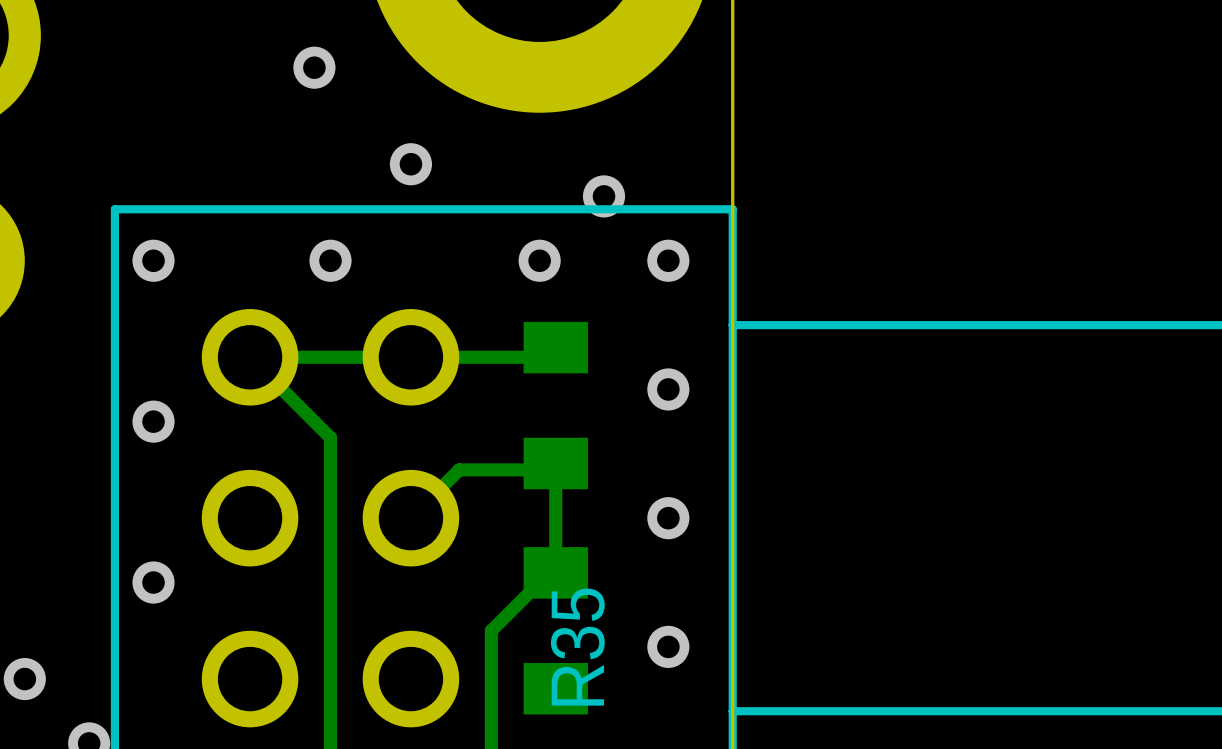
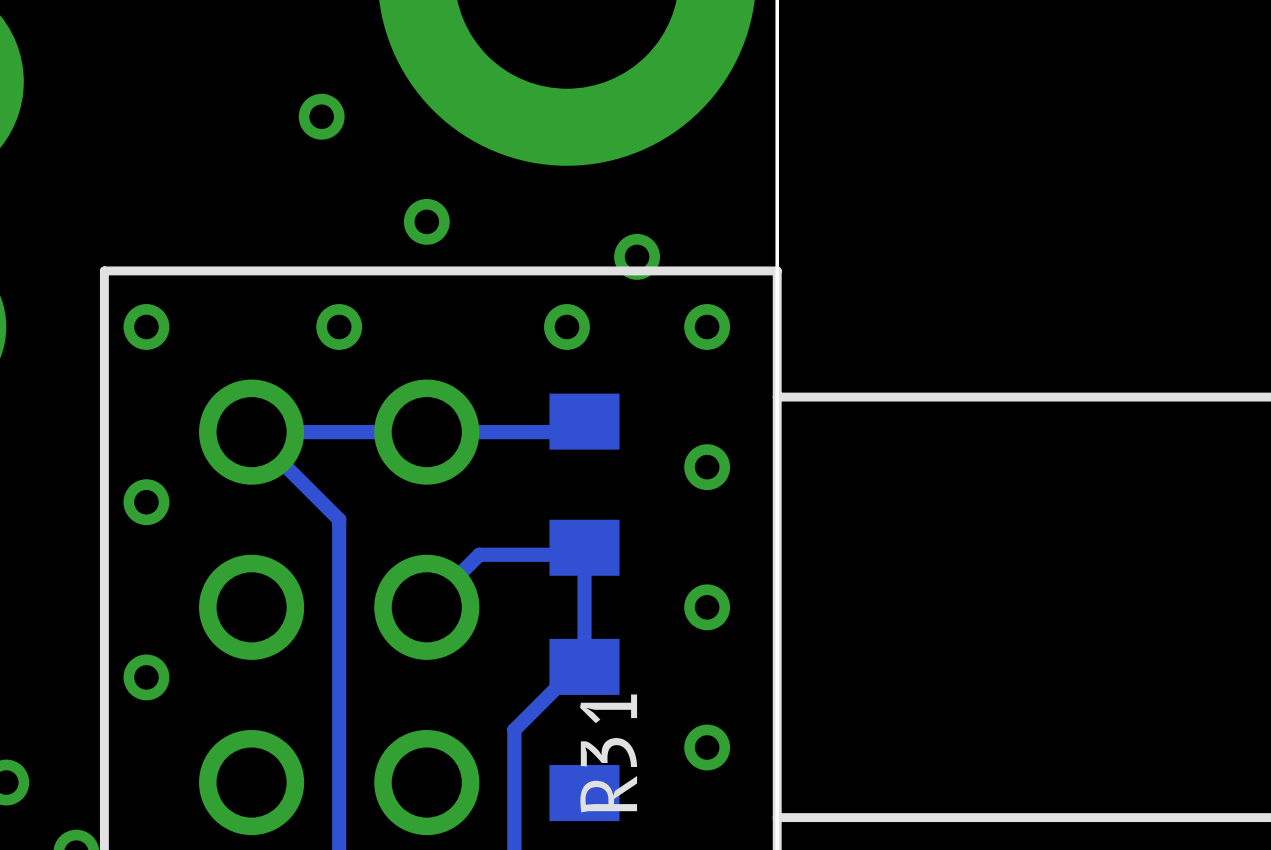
R35 name: R35 (577, 647) -> R31 (608, 753)

